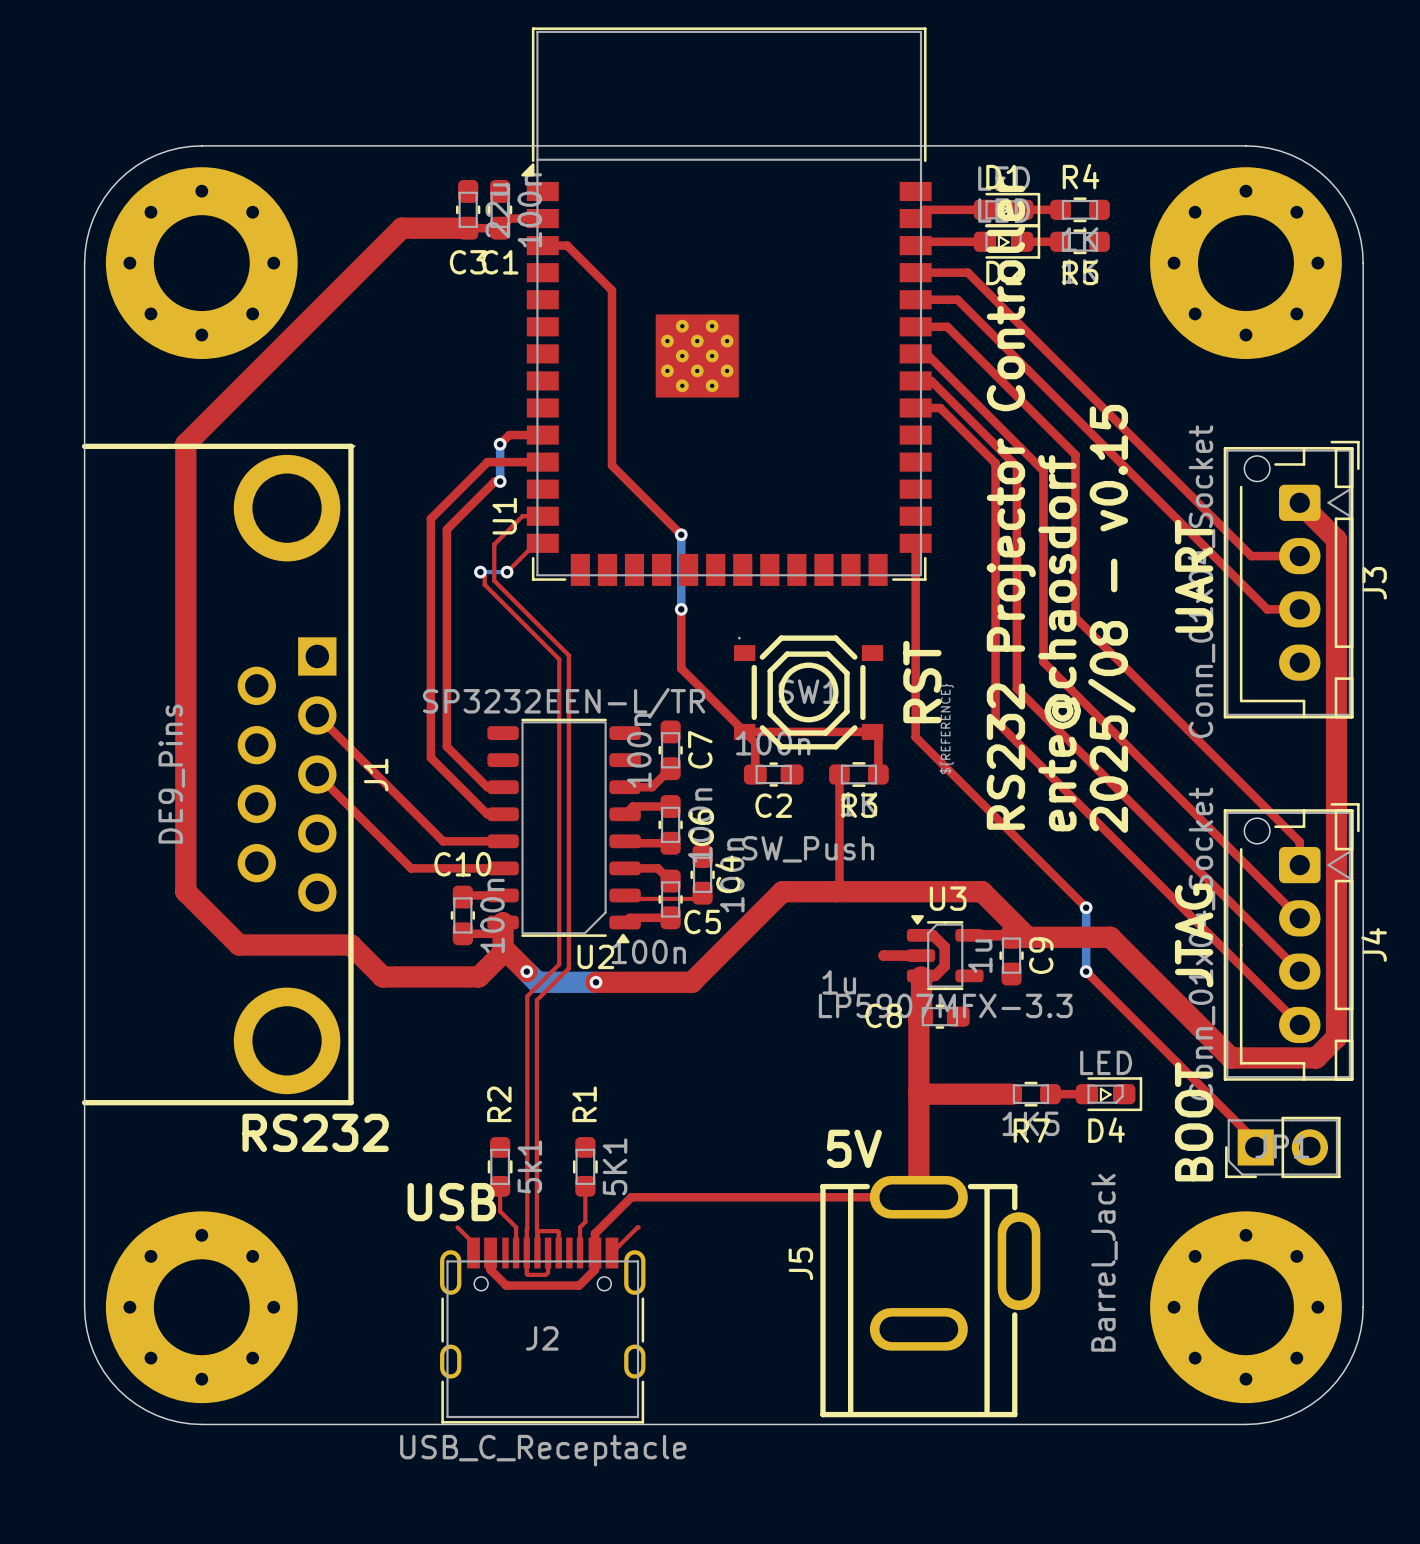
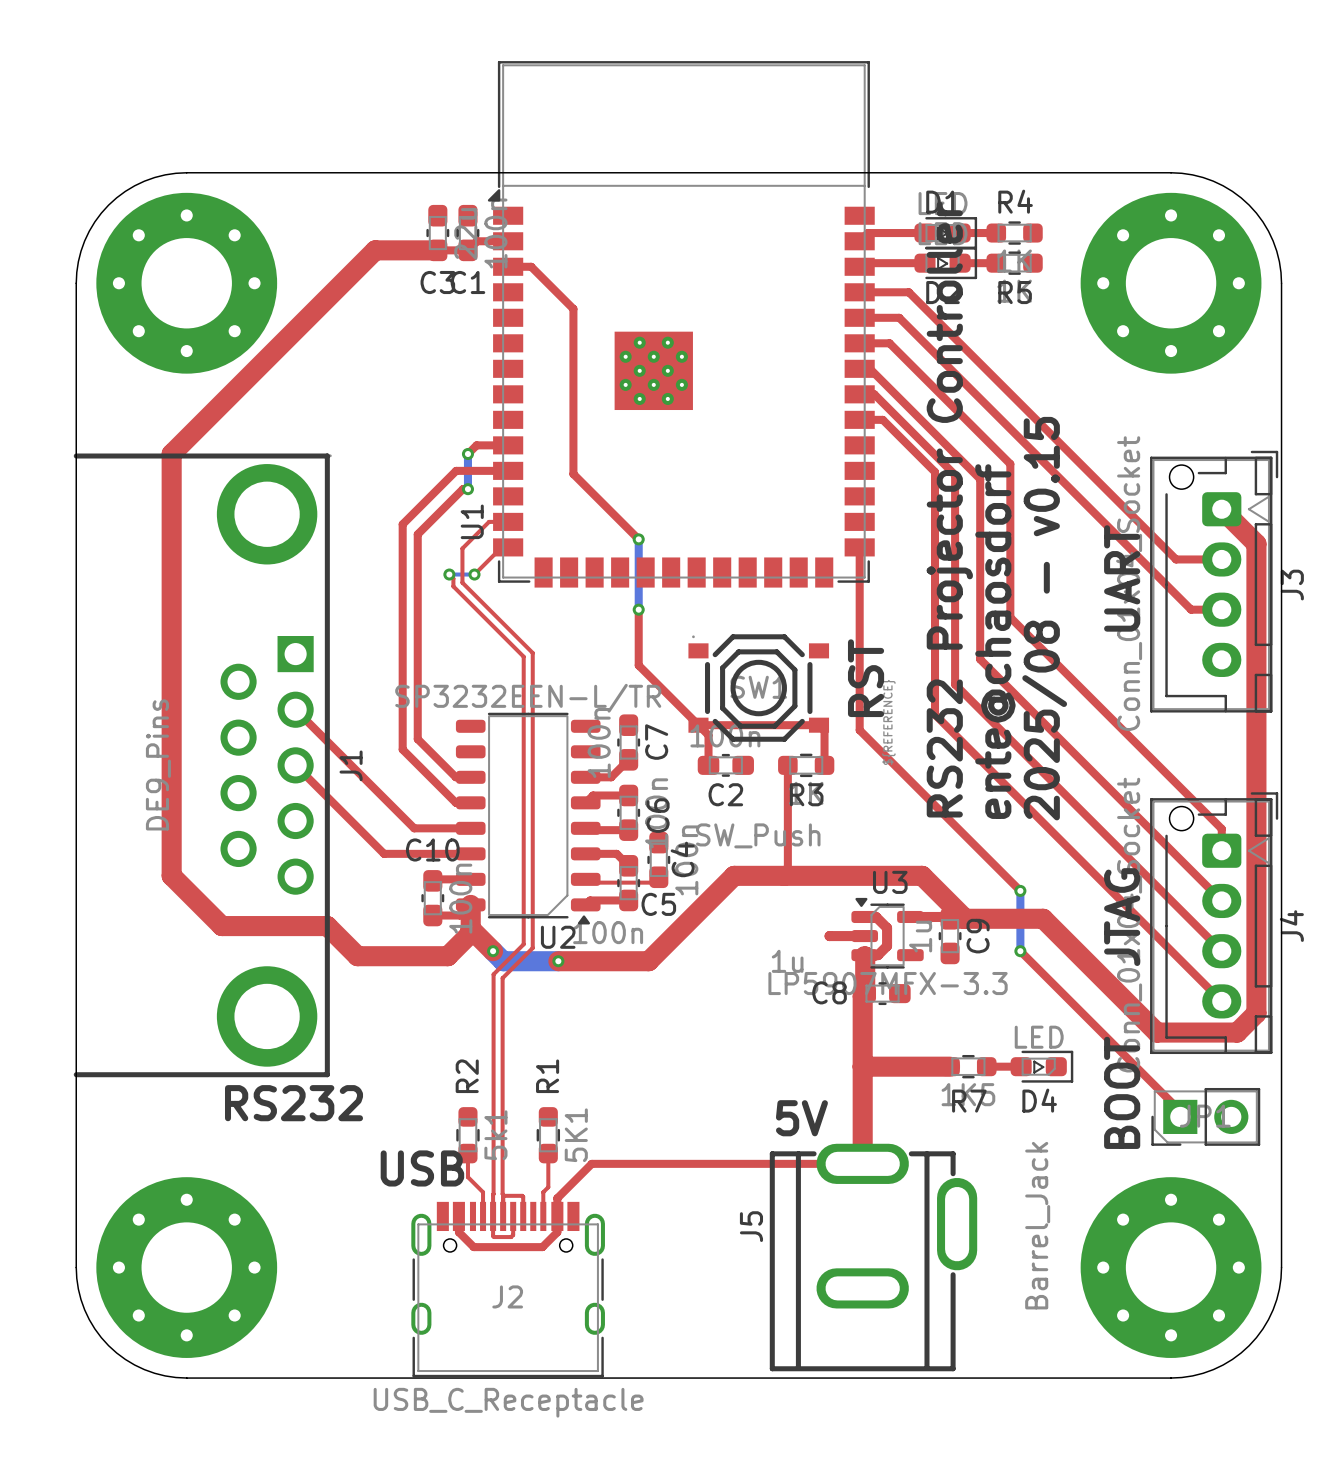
top track: (457, 1227) (473, 1243) (473, 1253) -> none
top track: (638, 1227) (612, 1253) -> none

